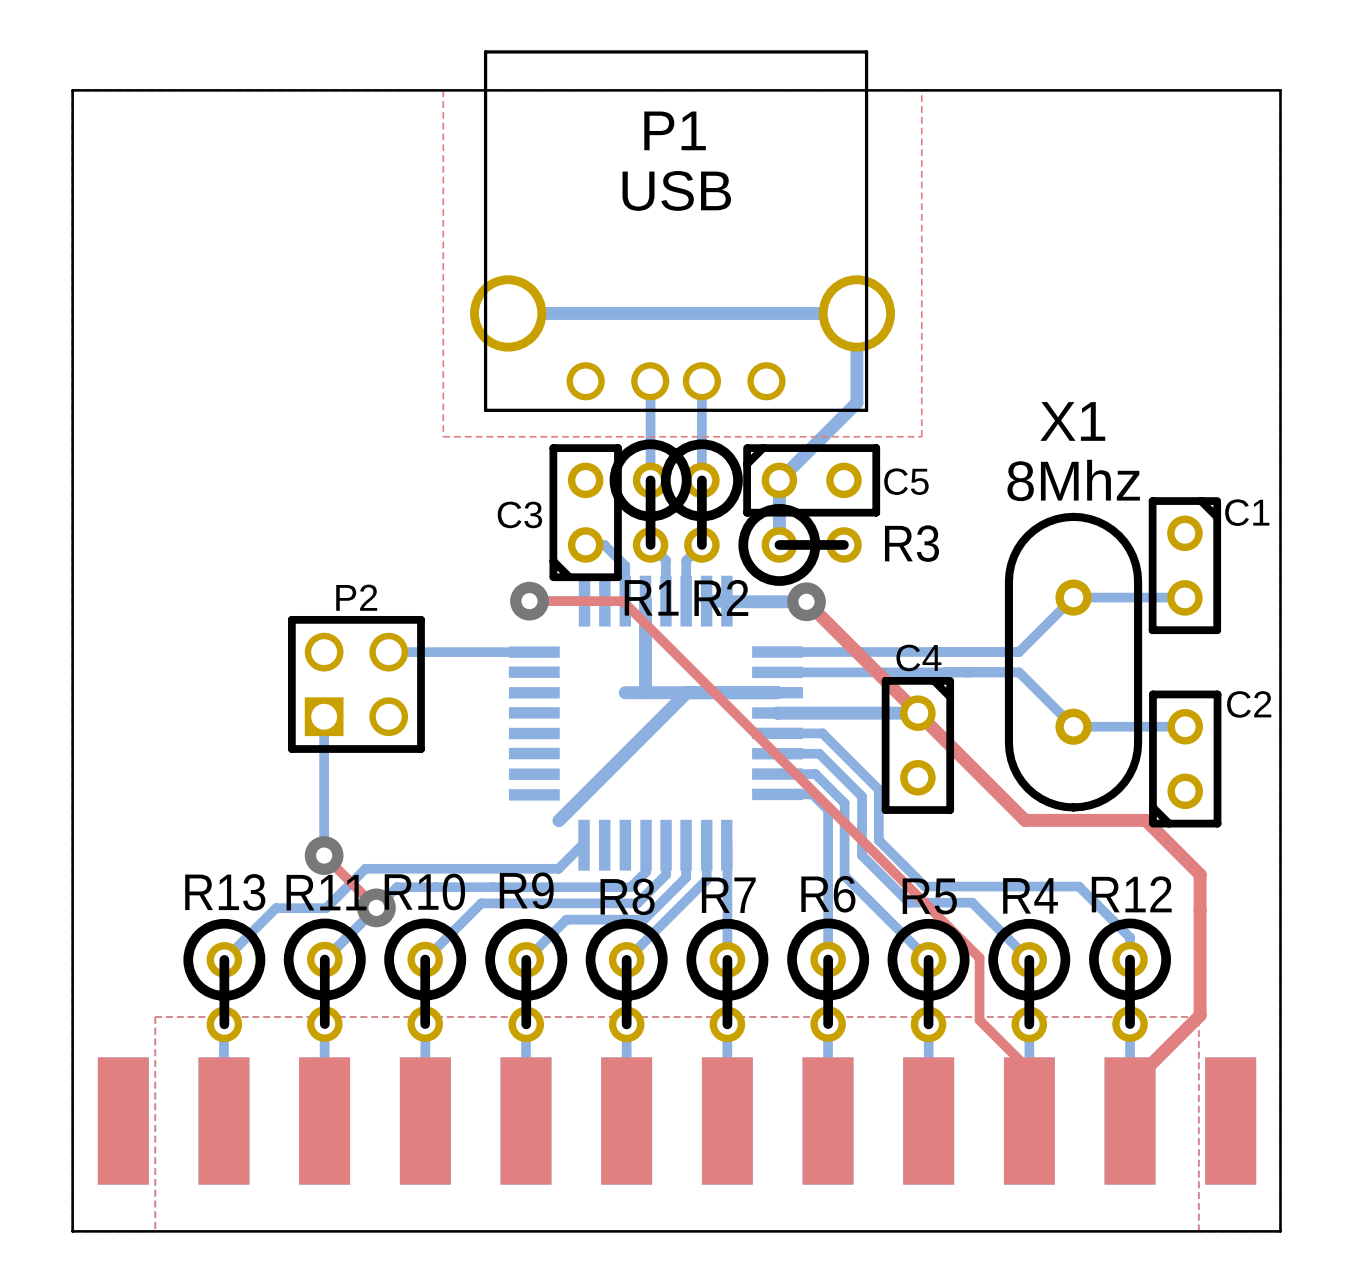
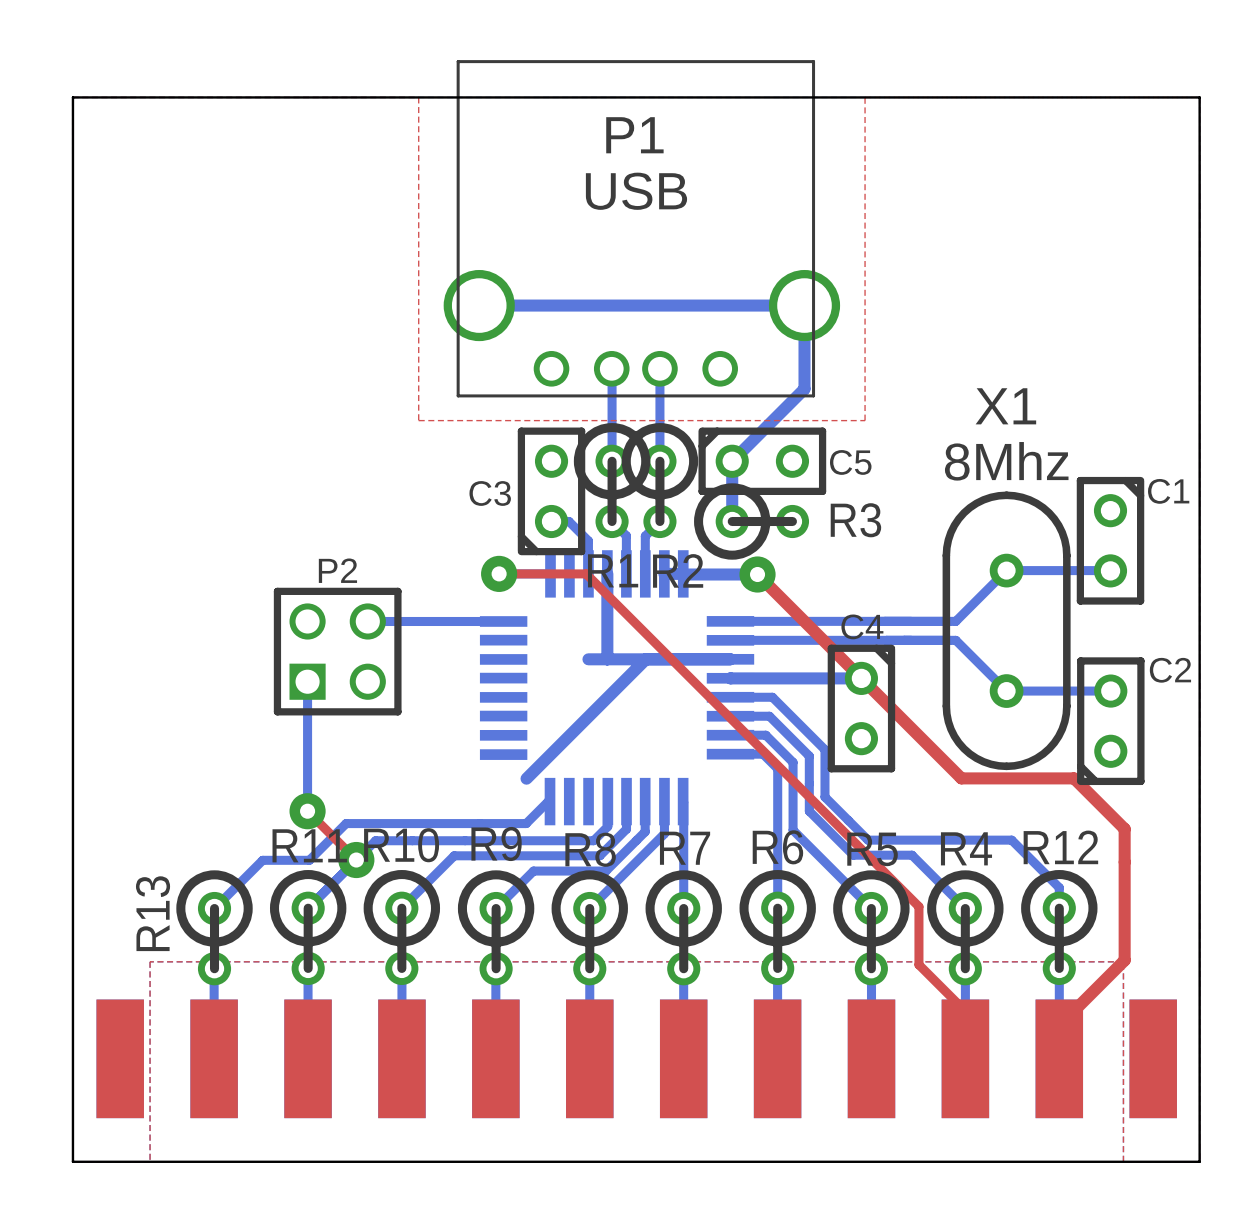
R13 name rotation: 0° (225, 892) -> 90° counterclockwise (153, 913)

